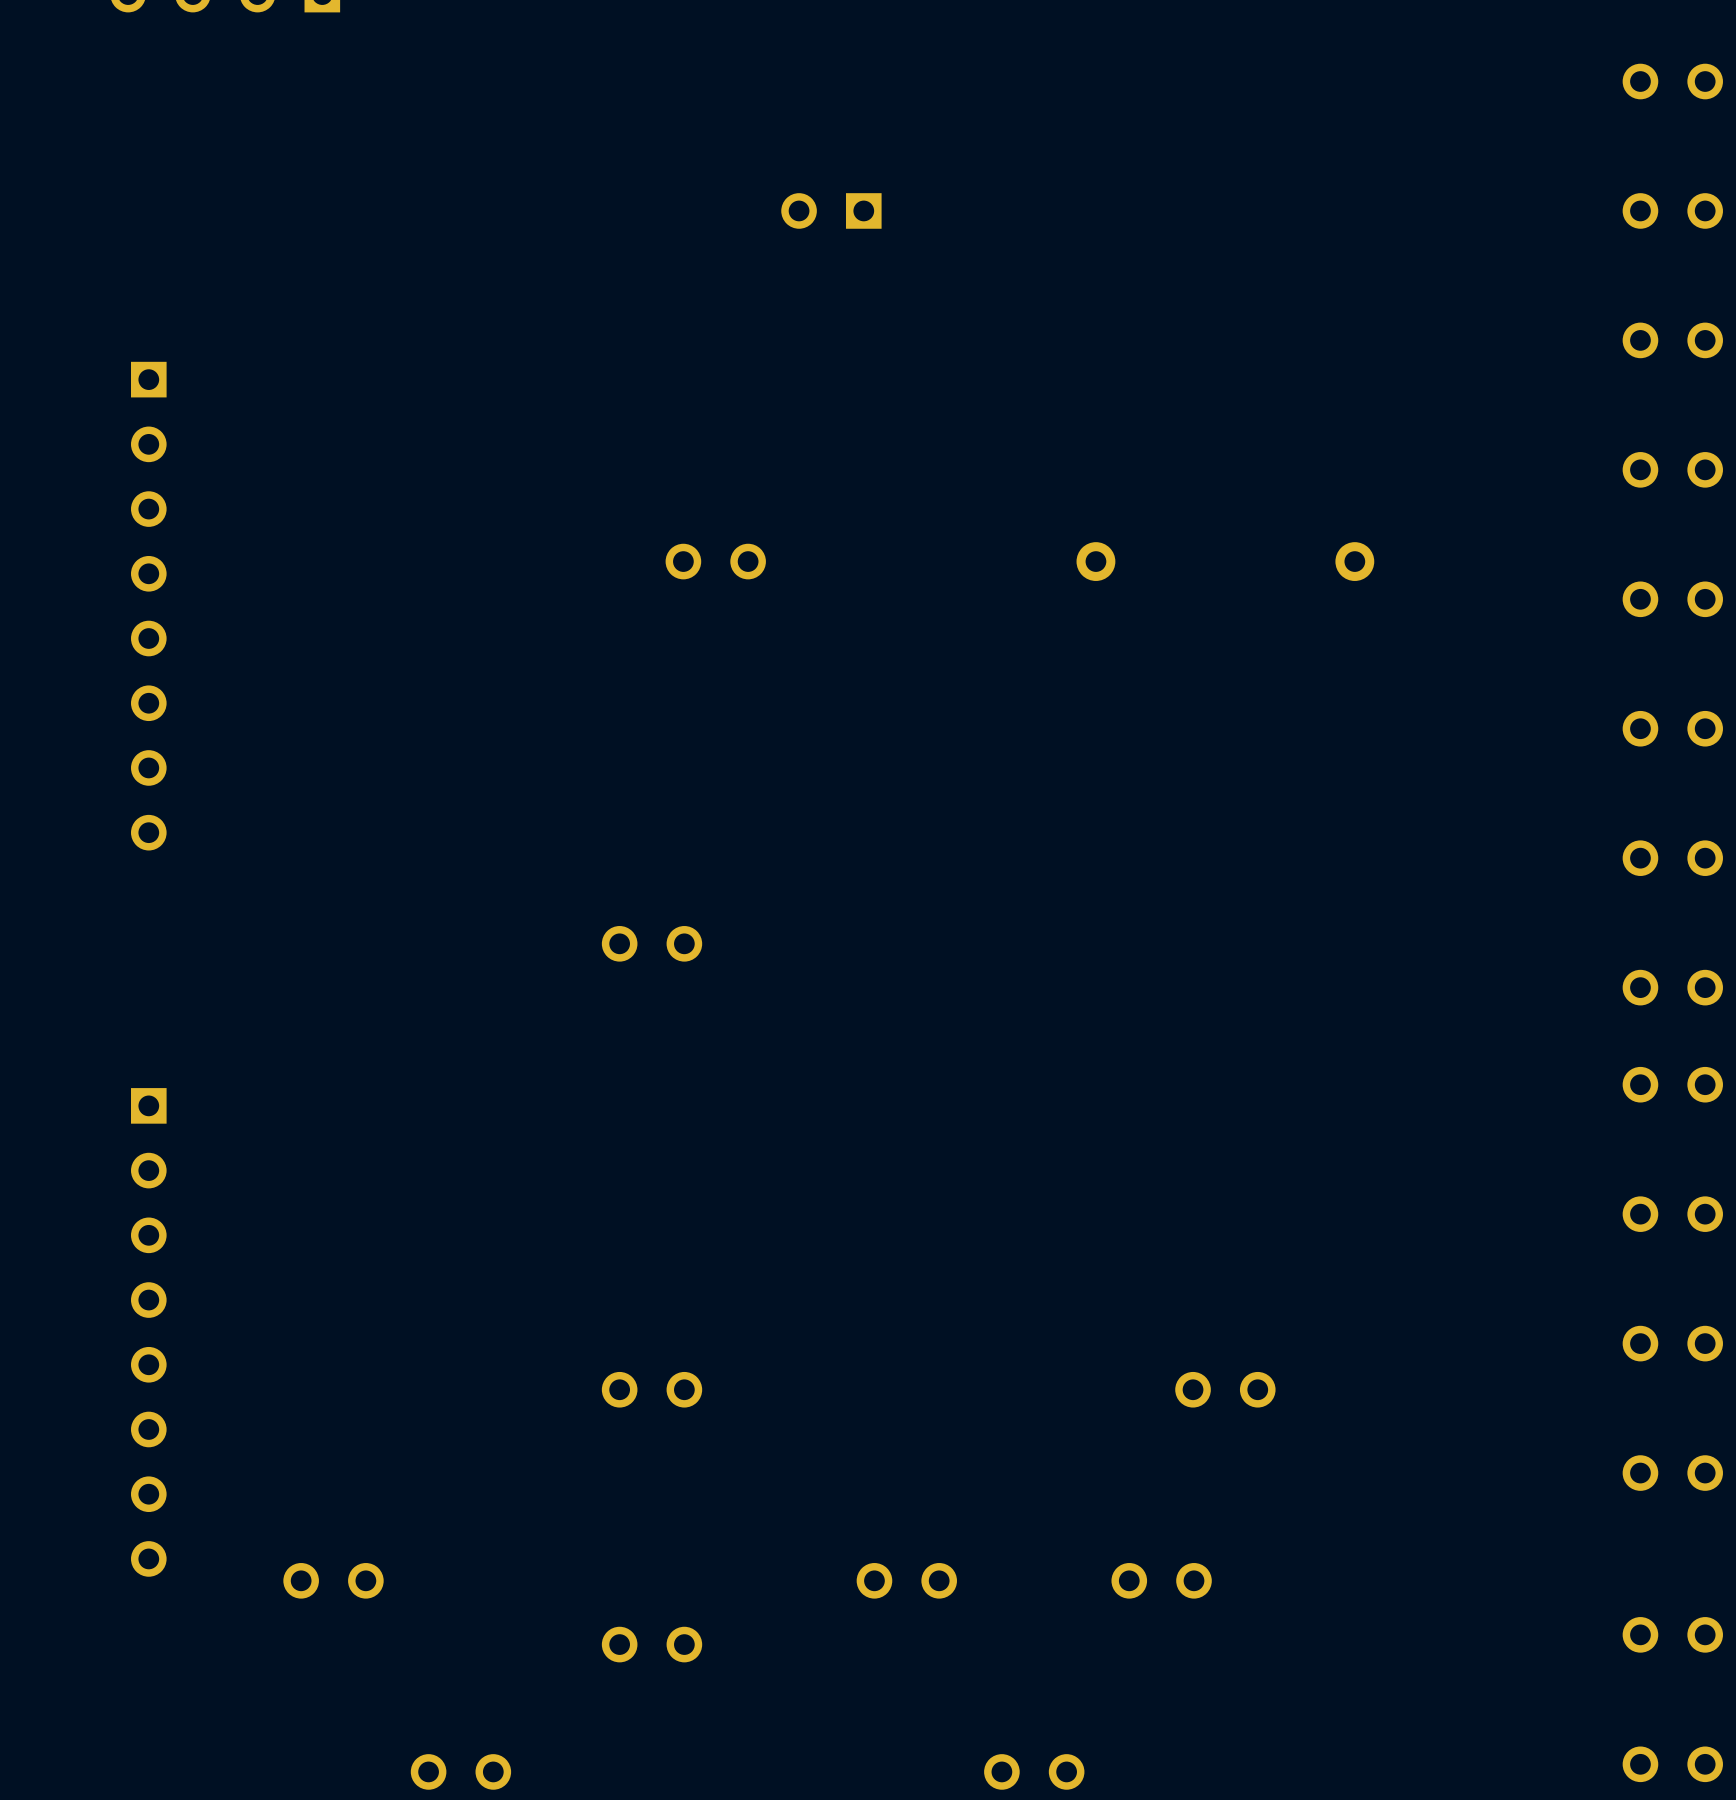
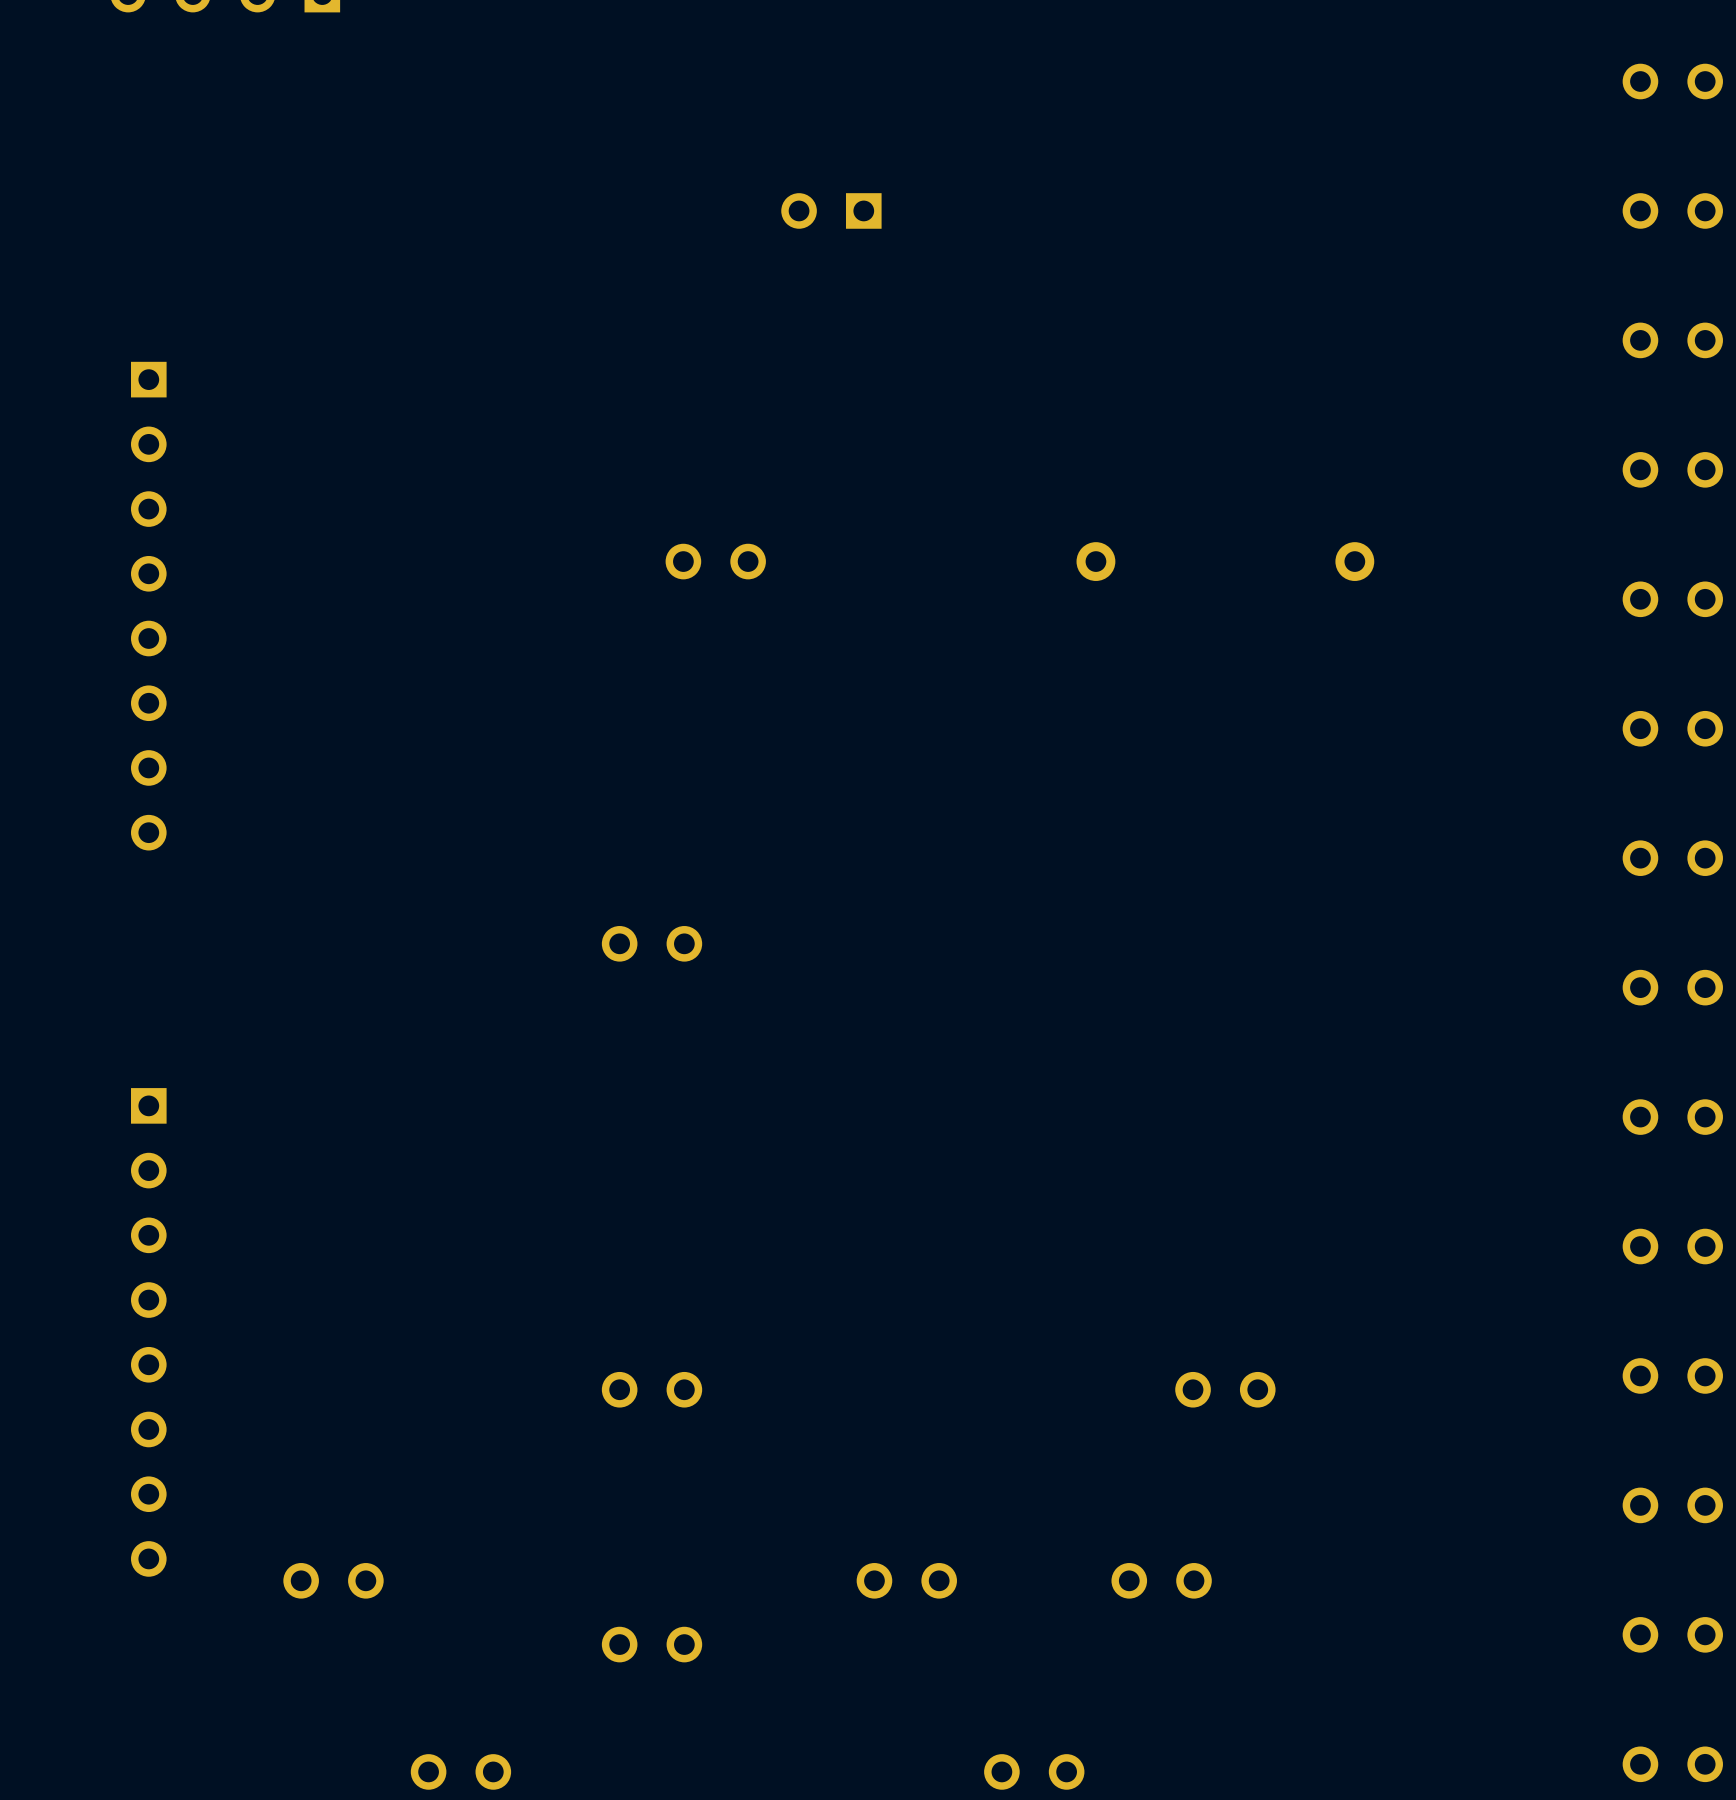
part position: (1672, 1084) -> (1672, 1117)
part position: (1672, 1214) -> (1672, 1246)
part position: (1672, 1343) -> (1672, 1375)
part position: (1672, 1473) -> (1672, 1505)

